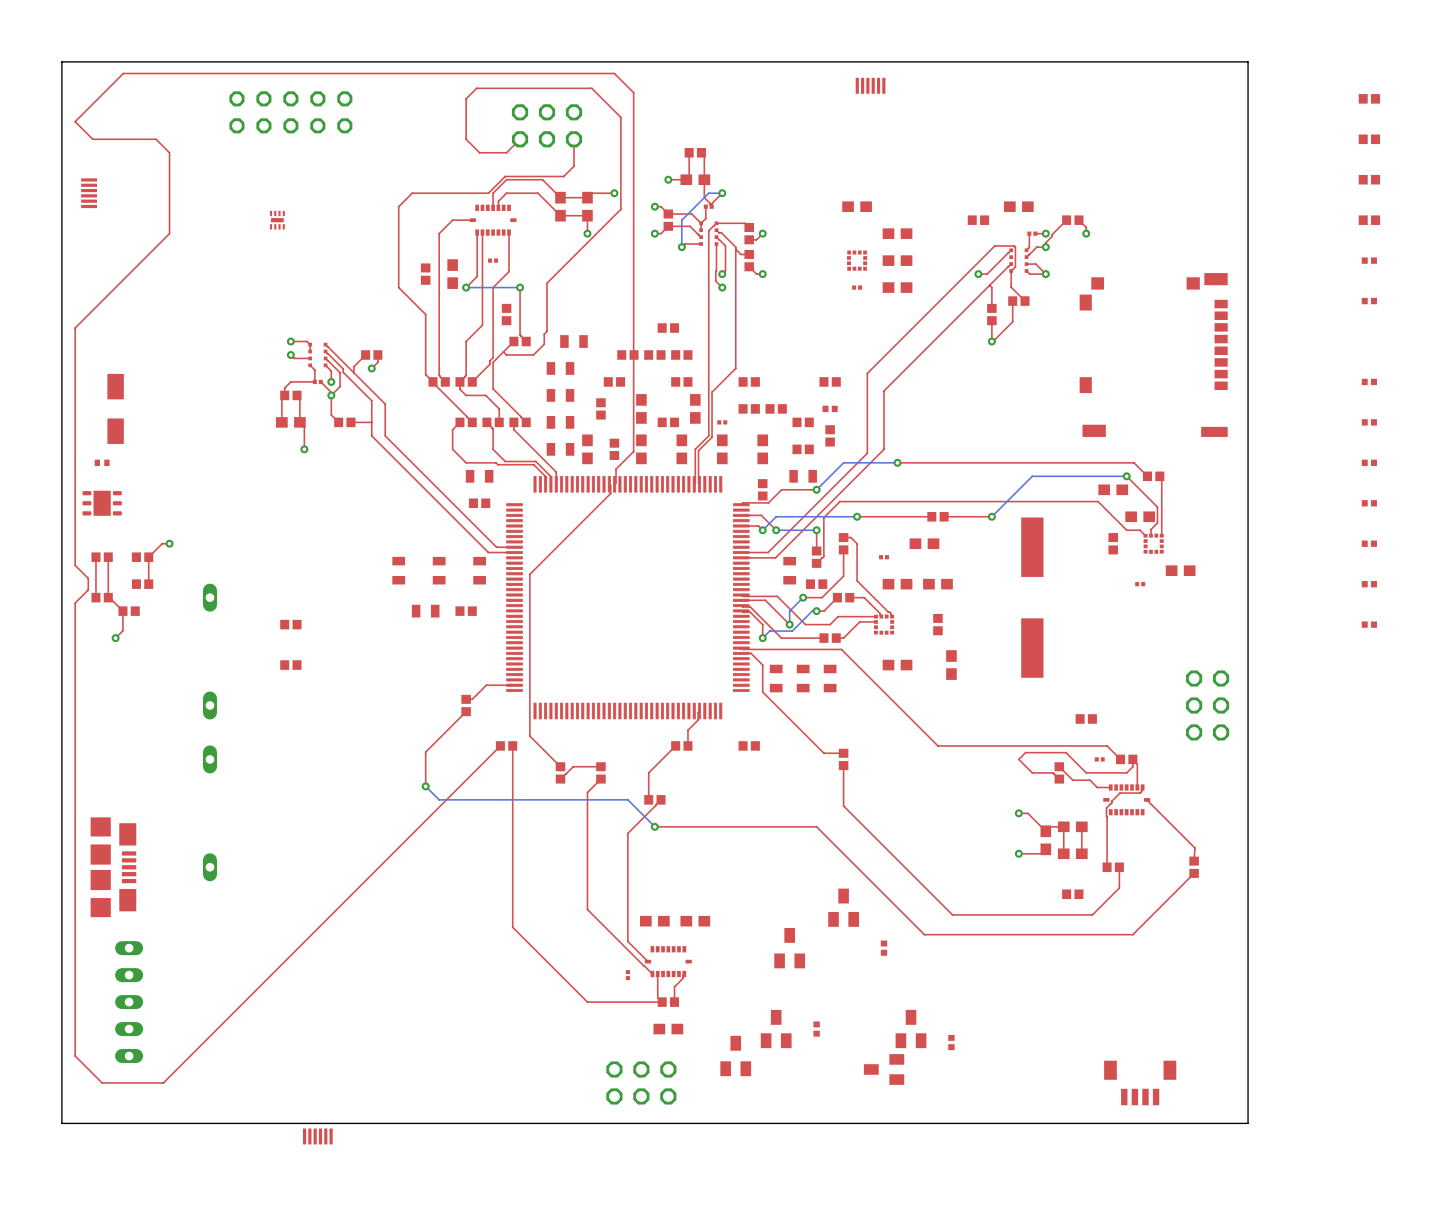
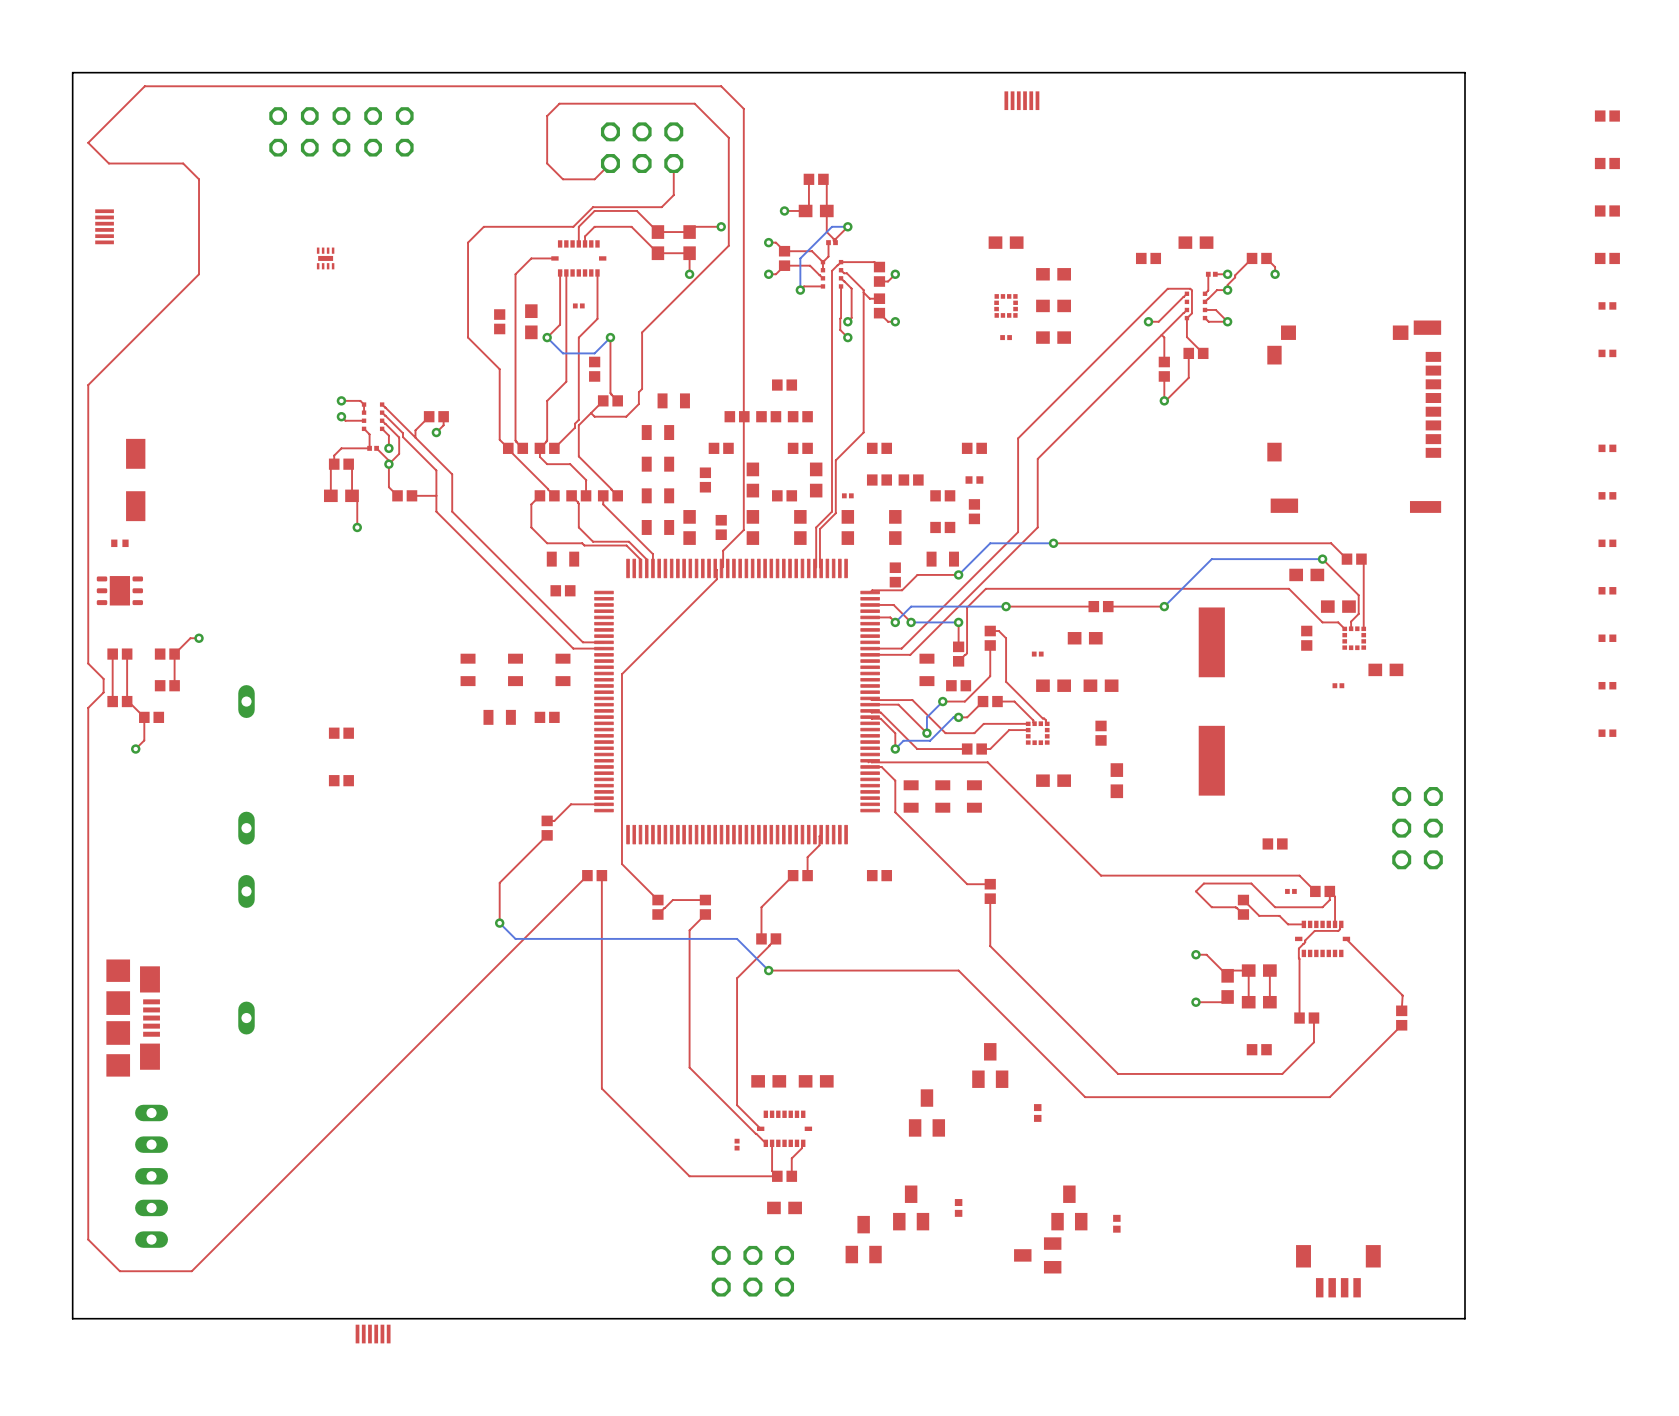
bottom track: (520, 287) (466, 287) -> (610, 337) (594, 353) (562, 353) (547, 337)

